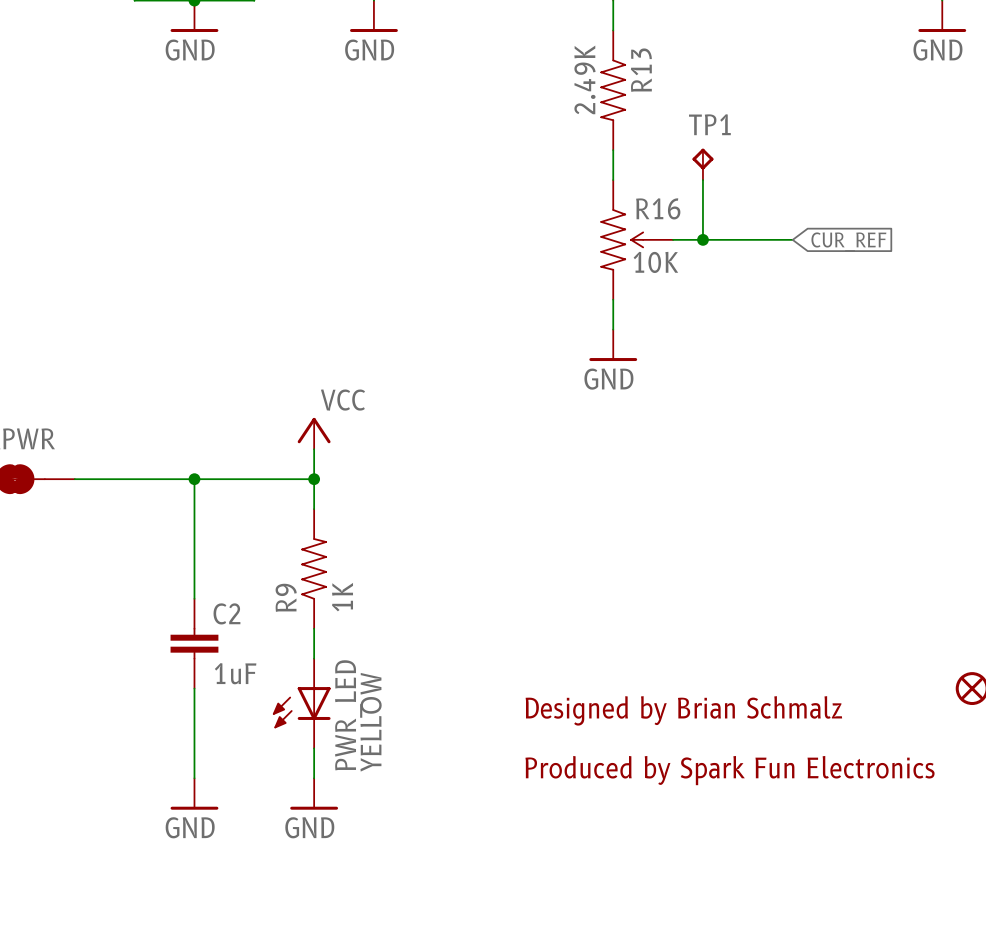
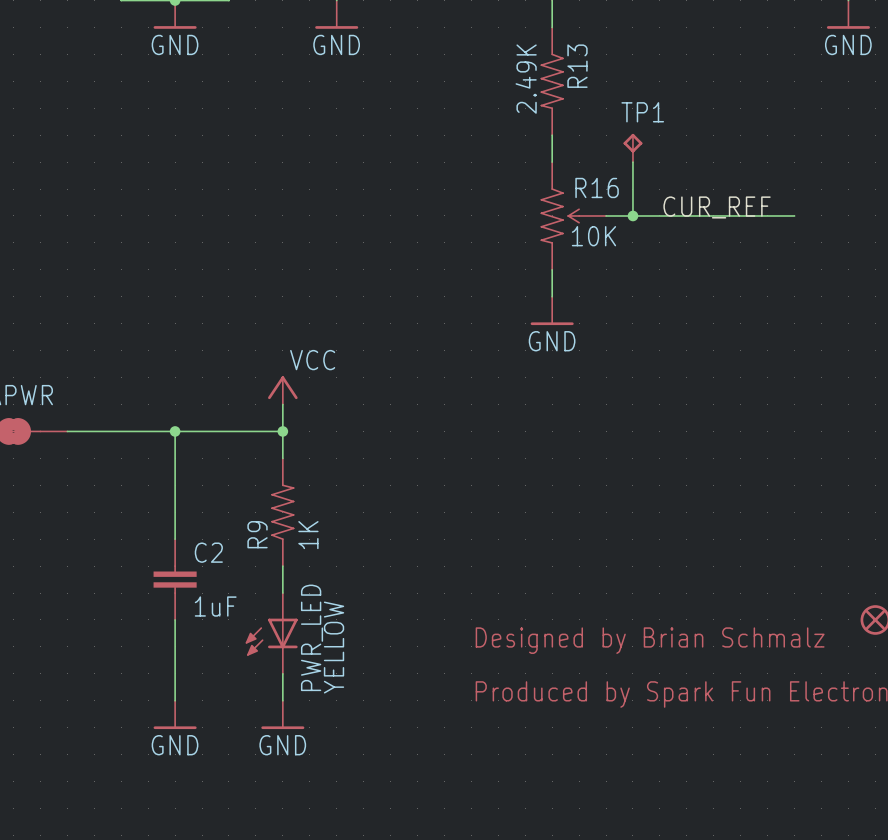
label: none -> CUR_REF (717, 207)
wire: none -> (713, 215) (794, 215)
global label: CUR_REF (848, 242) -> none

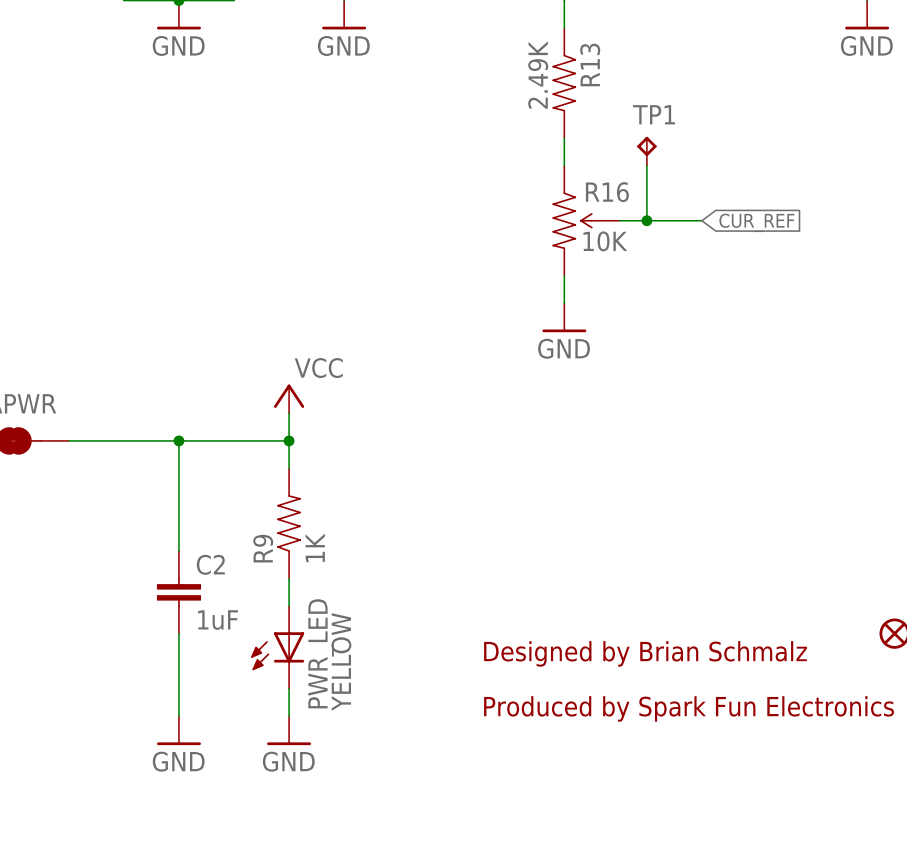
label: CUR_REF (717, 207) -> none
wire: (686, 215) (794, 215) -> none
global label: none -> CUR_REF (756, 222)

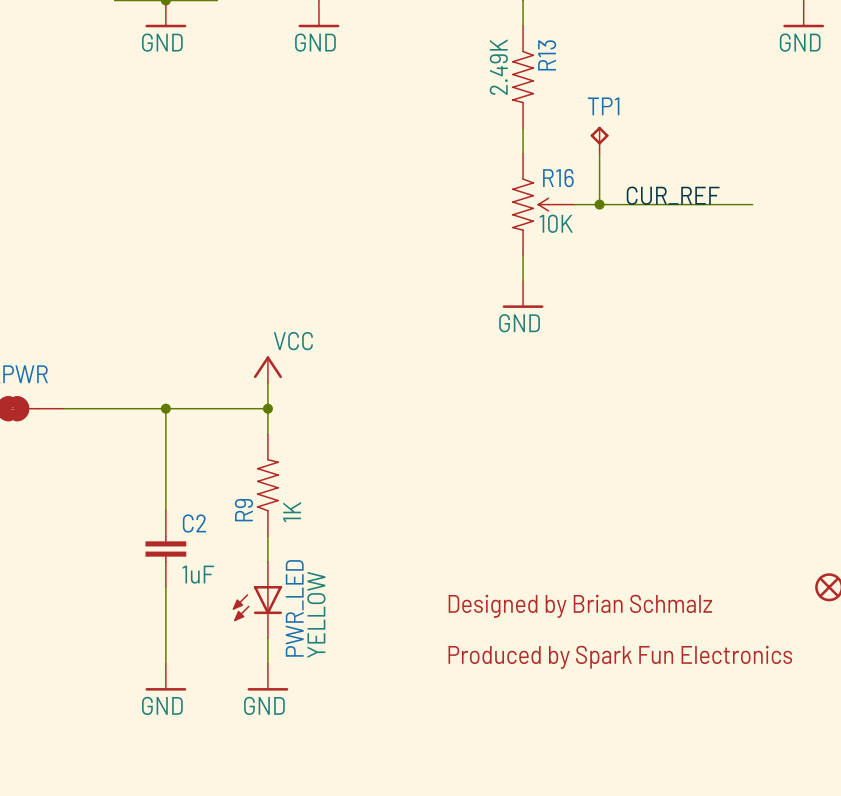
label: none -> CUR_REF (673, 195)
wire: none -> (650, 204) (752, 204)
global label: CUR_REF (756, 222) -> none

